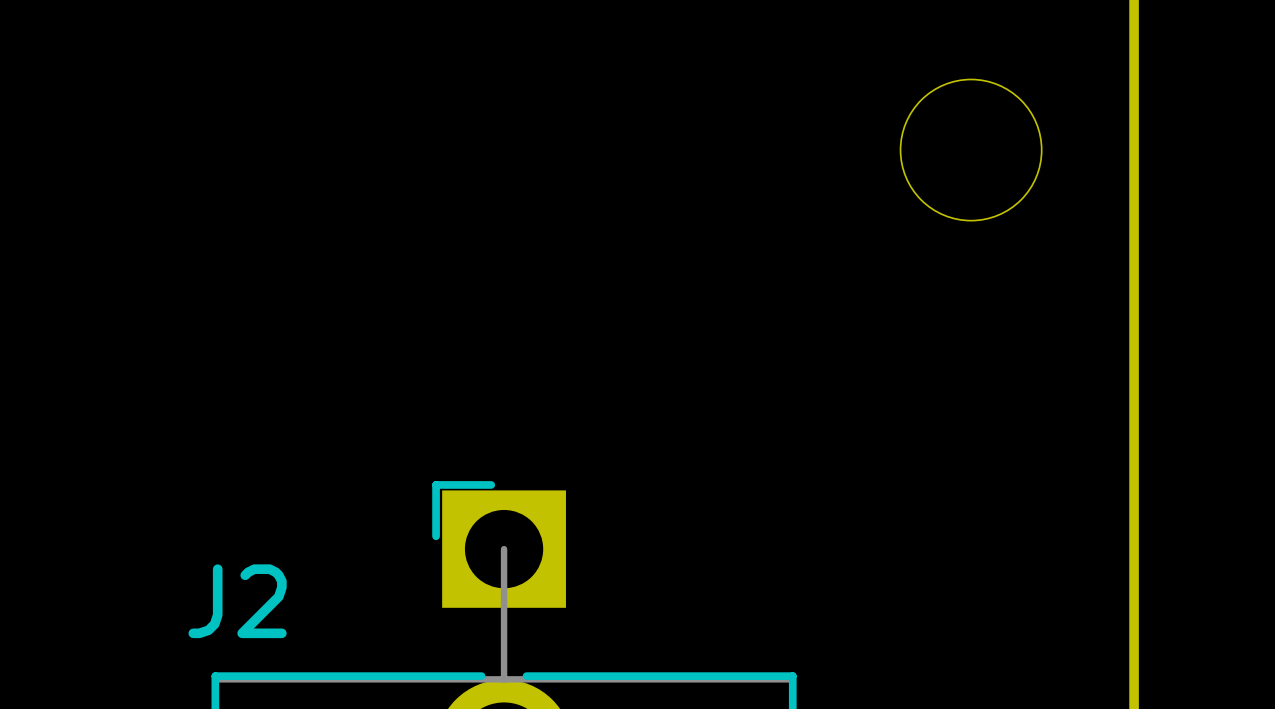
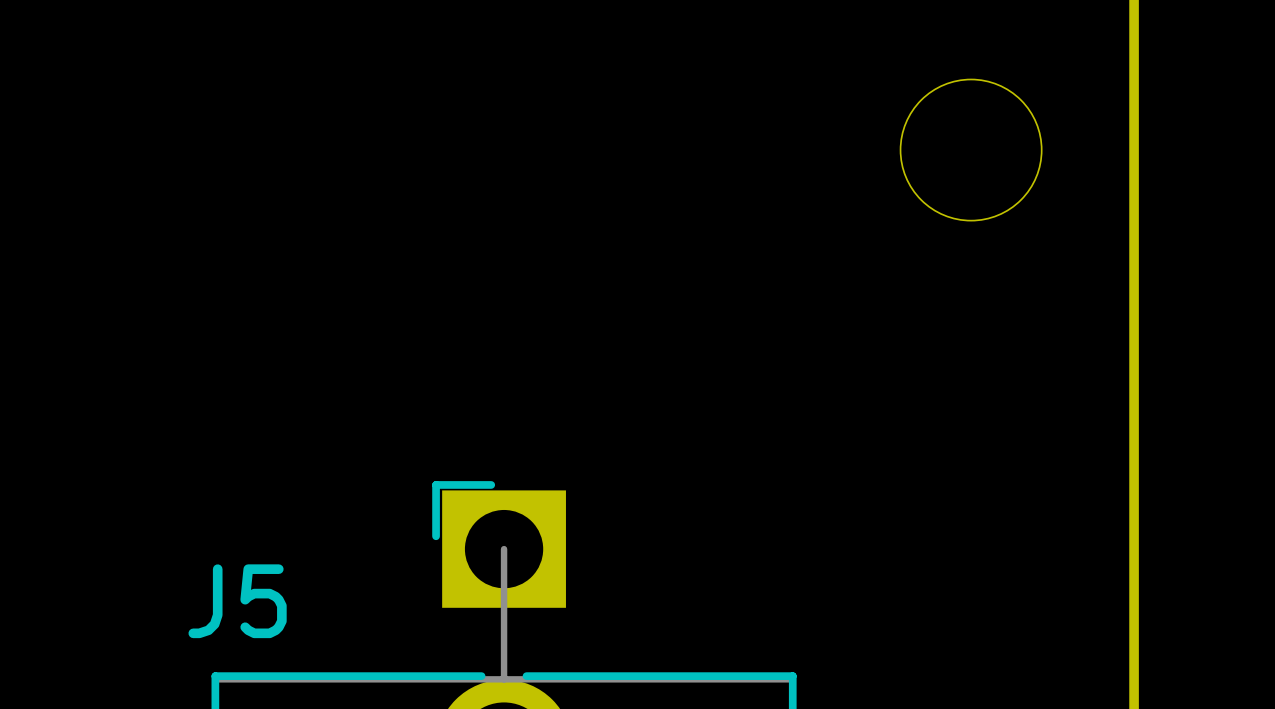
J2 name: J2 (237, 601) -> J5 (237, 601)

